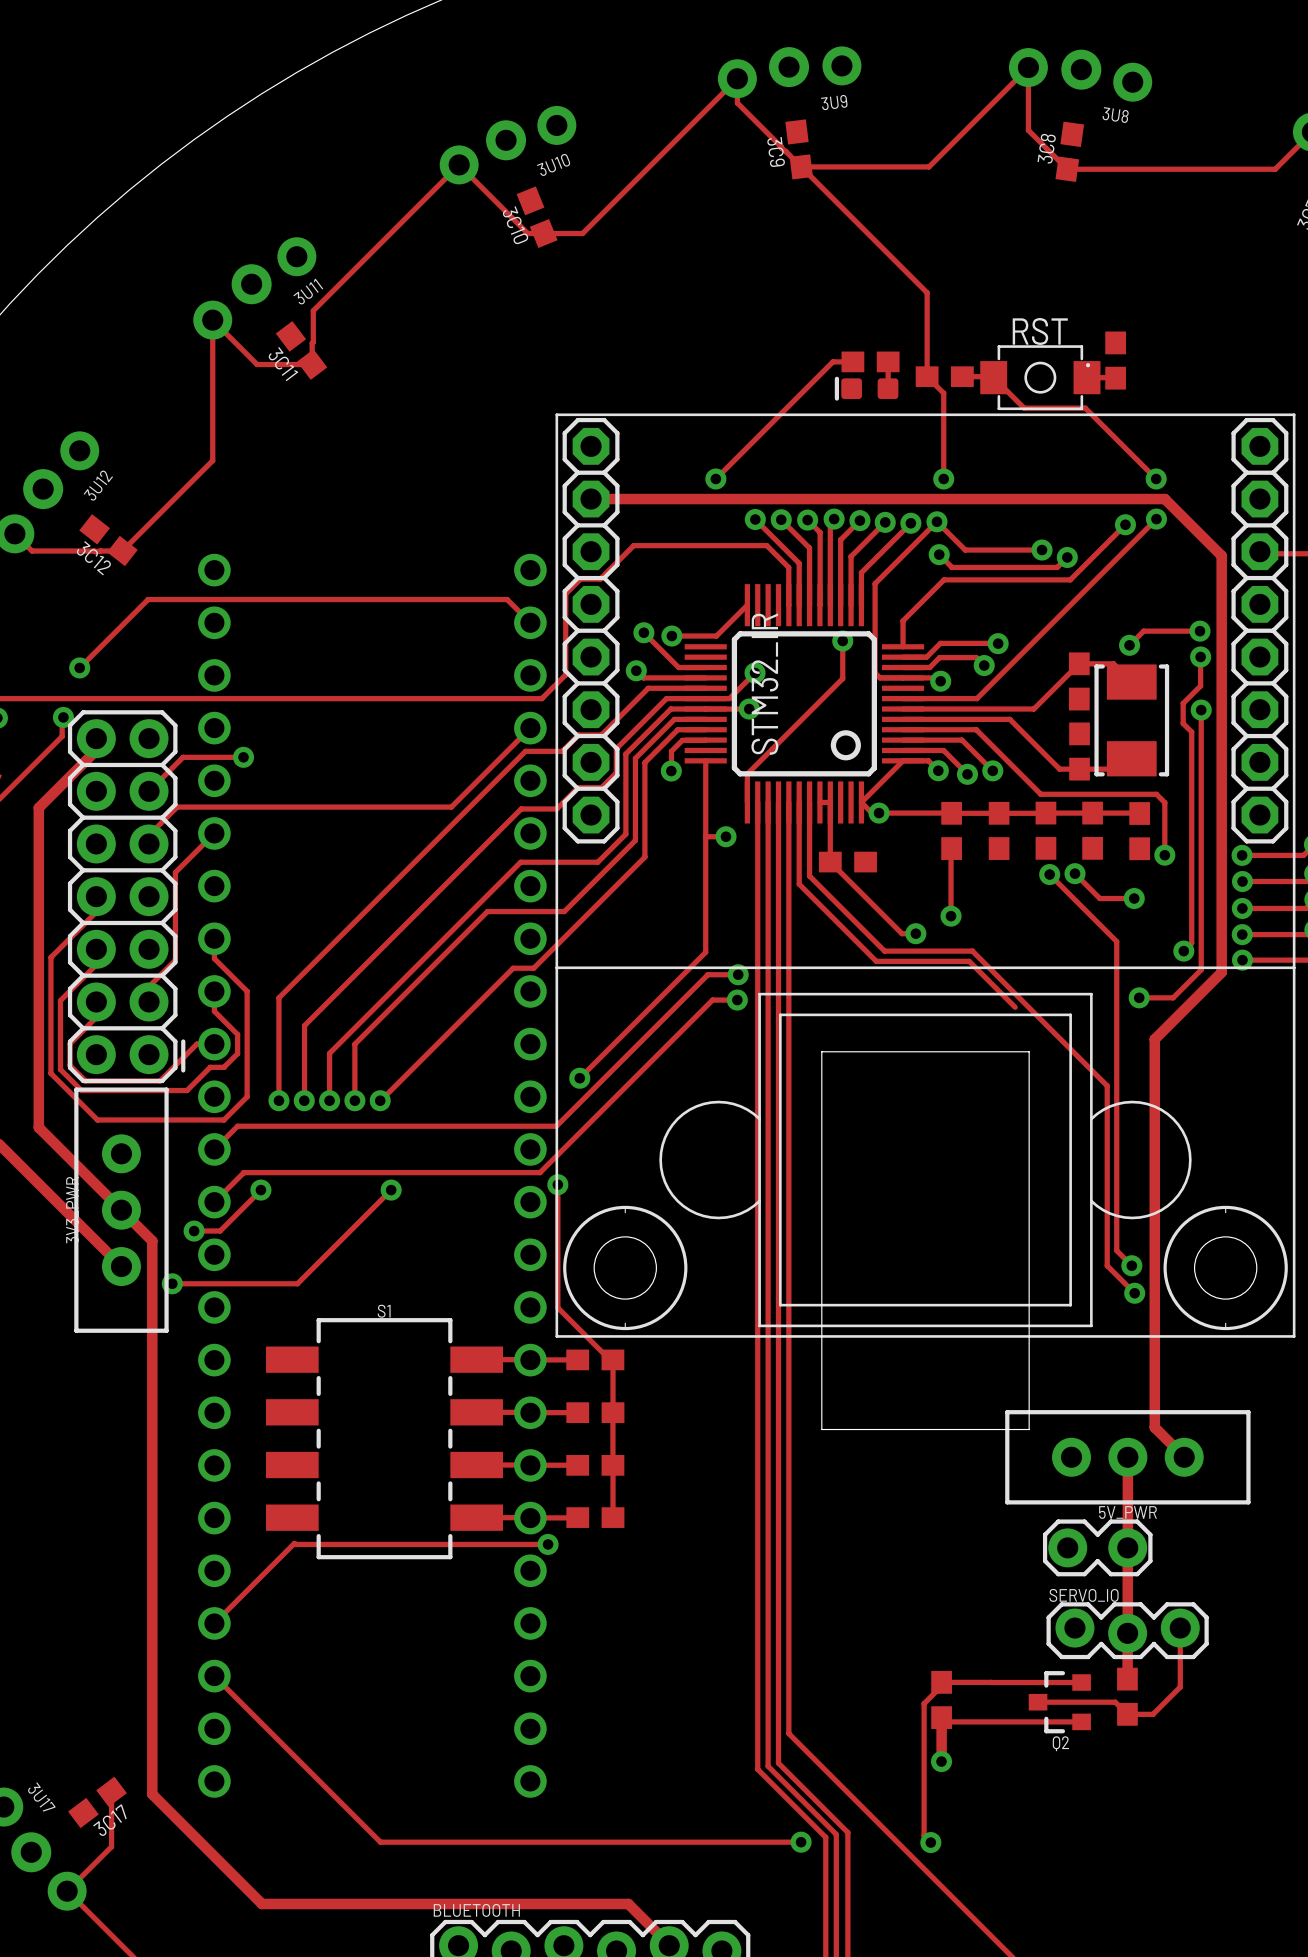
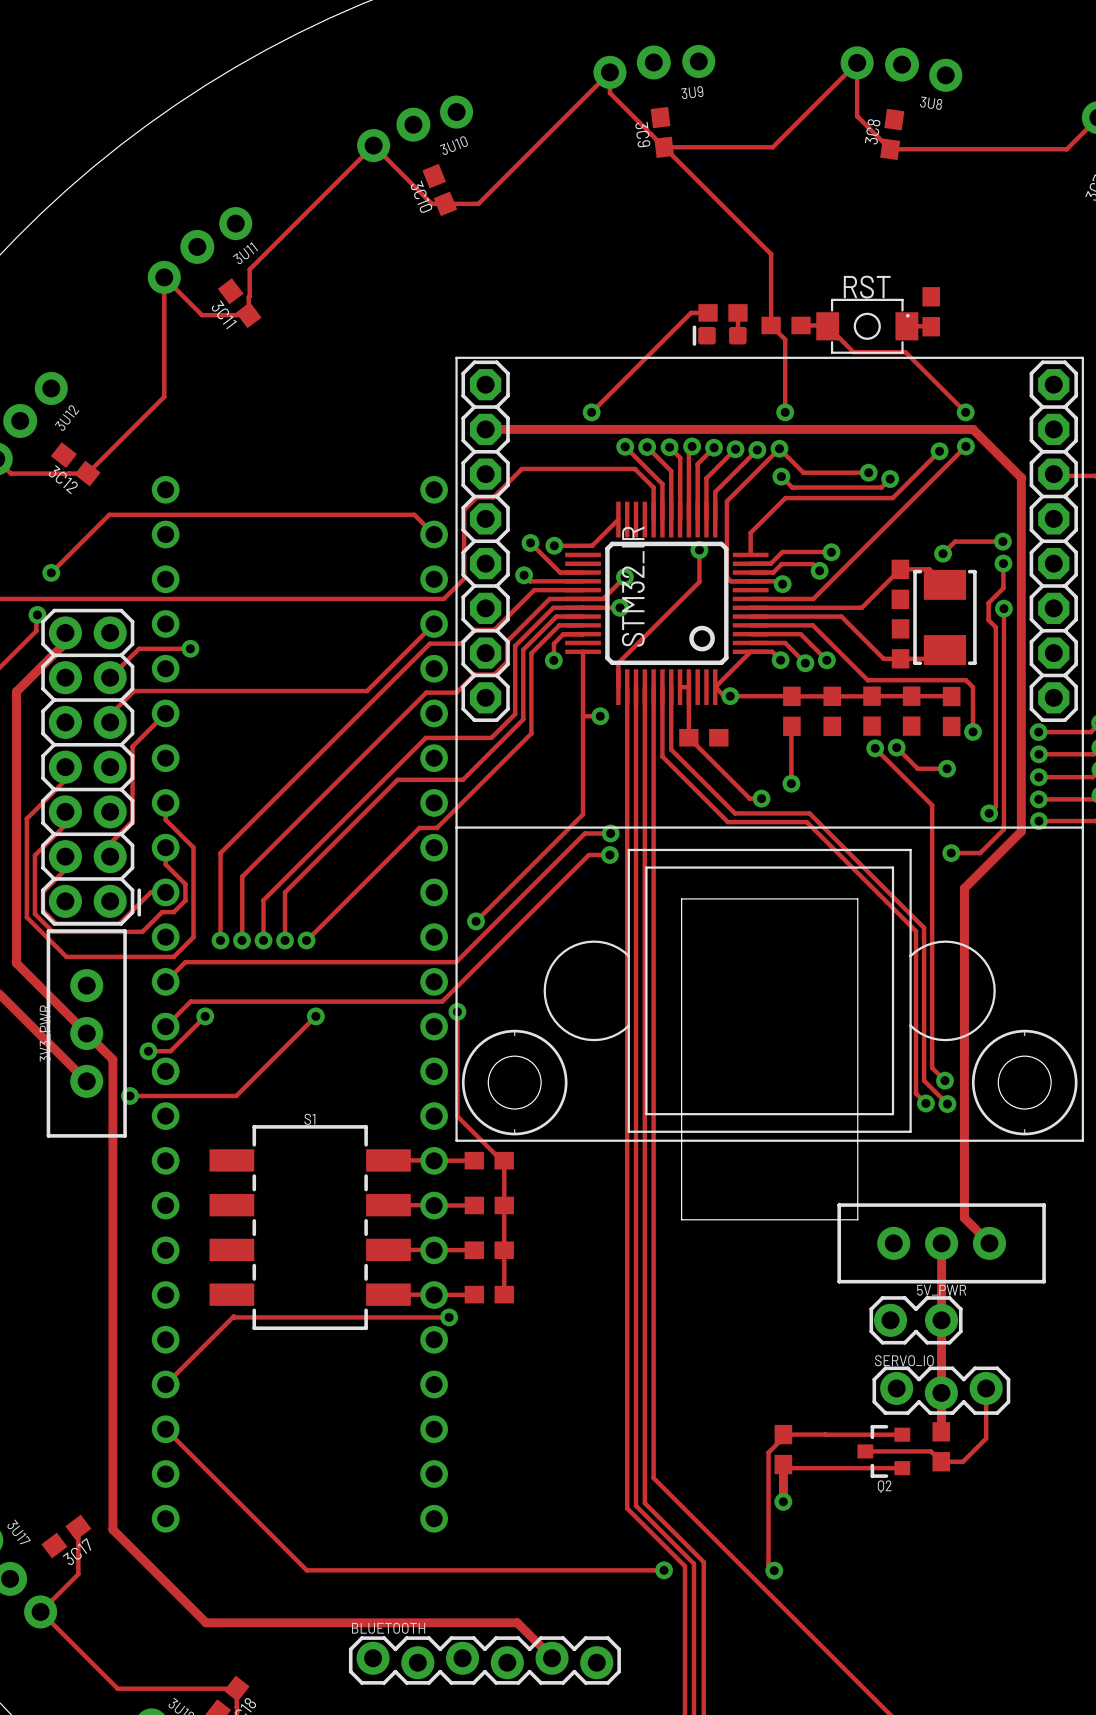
track: none -> (845, 861) (916, 931) (916, 1093) (925, 1103)
via: none -> (925, 1103)

